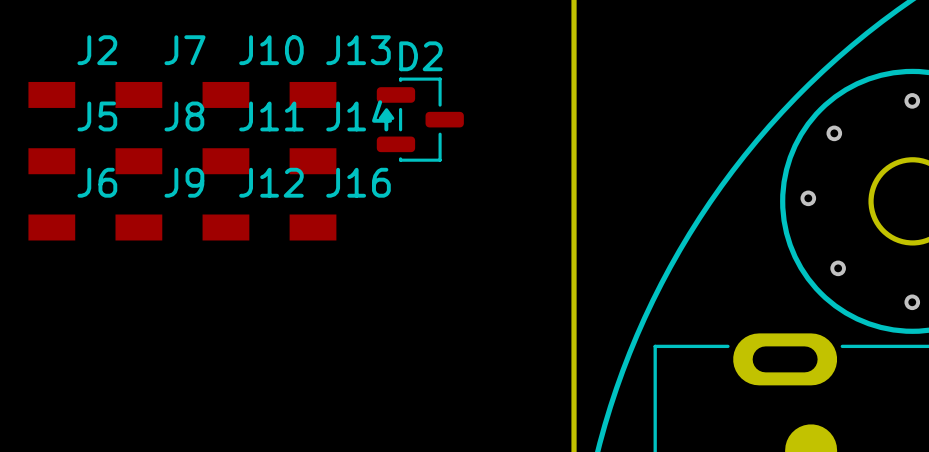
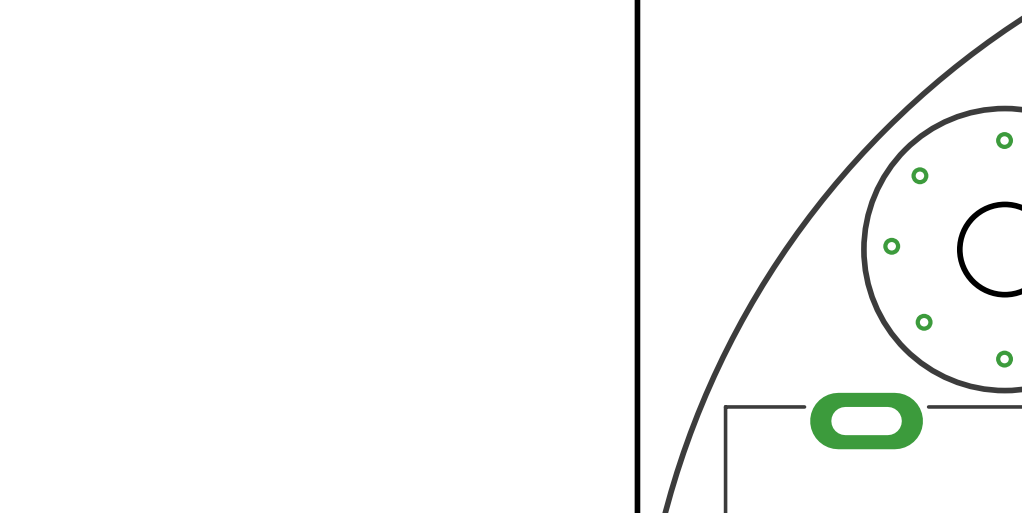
J2: (51, 94) -> none
J7: (138, 94) -> none
J10: (225, 94) -> none
J13: (313, 94) -> none
D2: (420, 119) -> none
J5: (51, 161) -> none
J8: (138, 161) -> none
J11: (225, 161) -> none
J14: (313, 161) -> none
J6: (51, 227) -> none
J9: (138, 227) -> none
J12: (225, 227) -> none
J16: (313, 227) -> none

